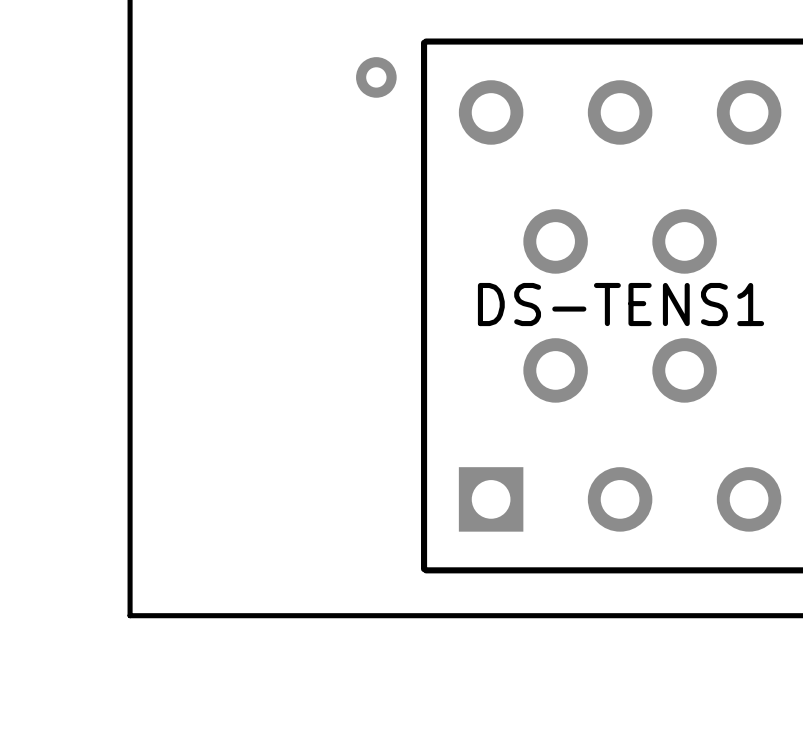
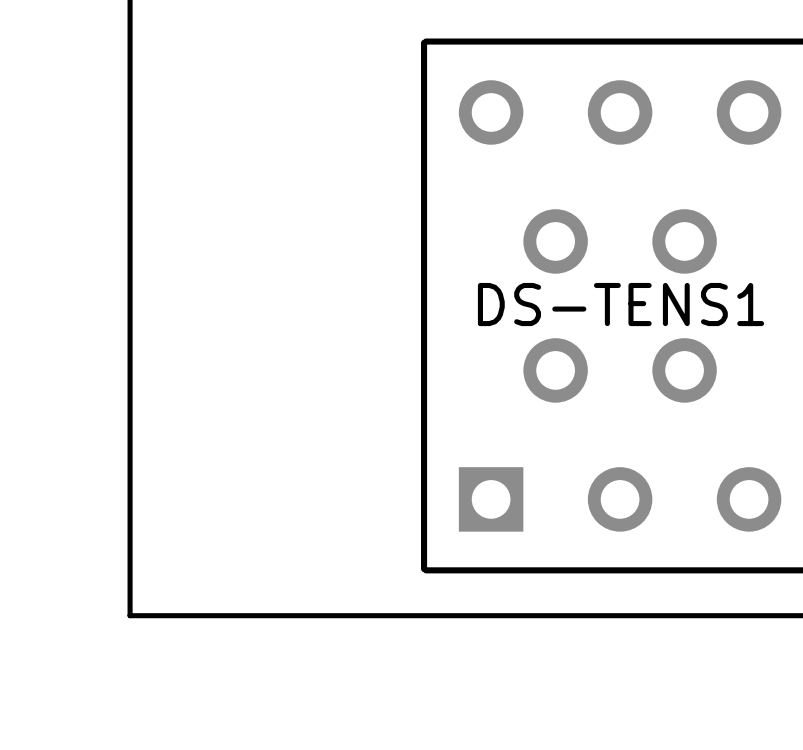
via: (376, 77) -> none

